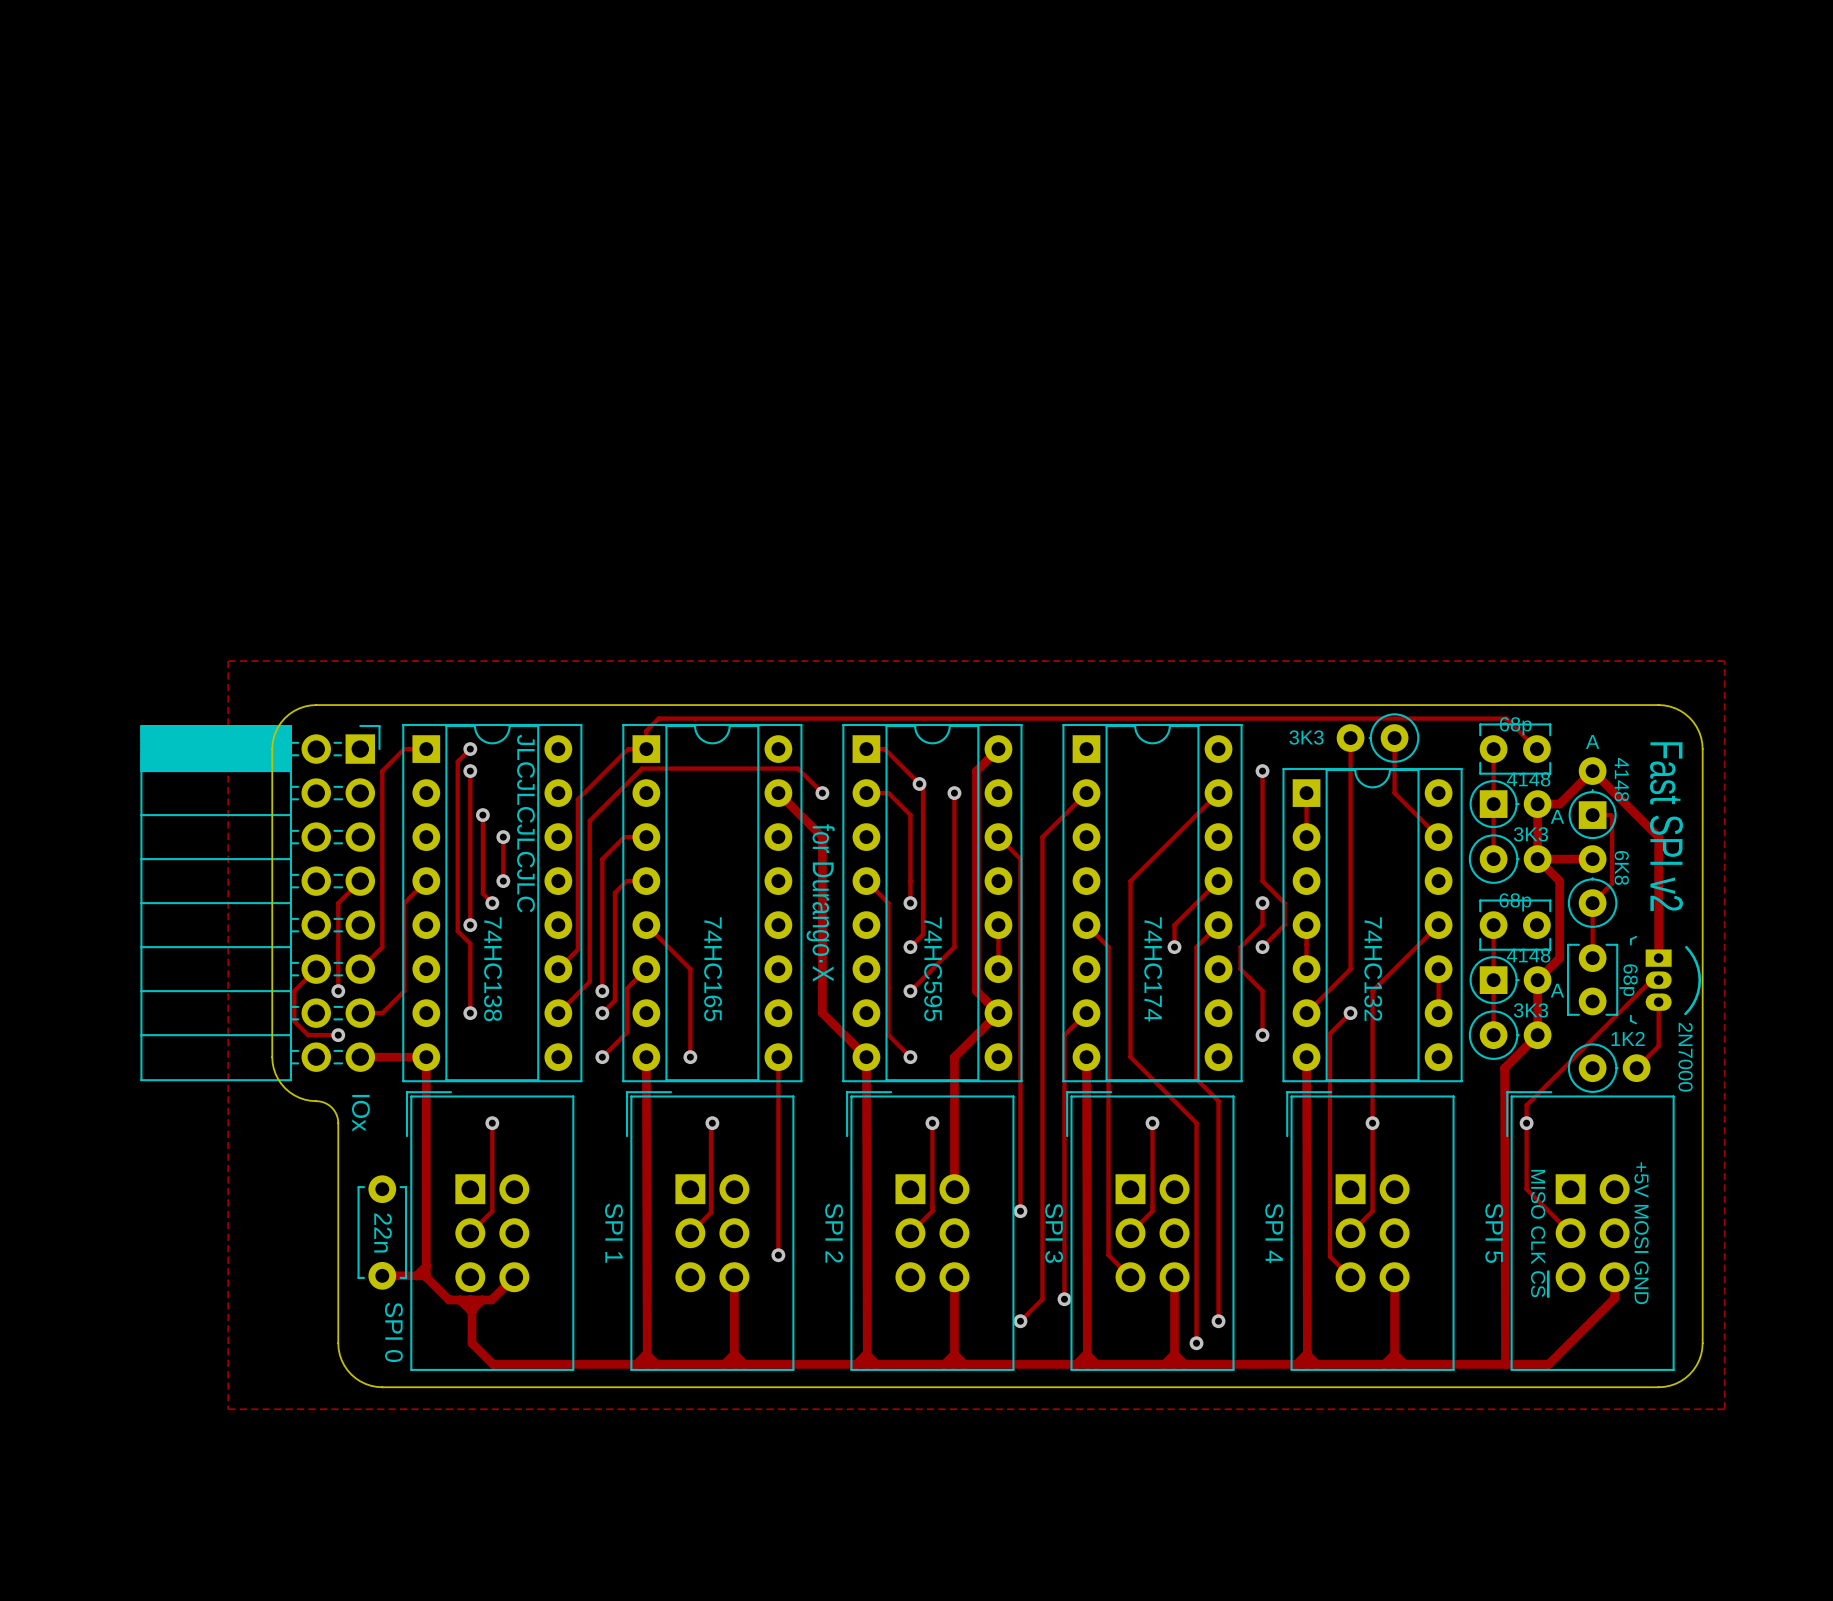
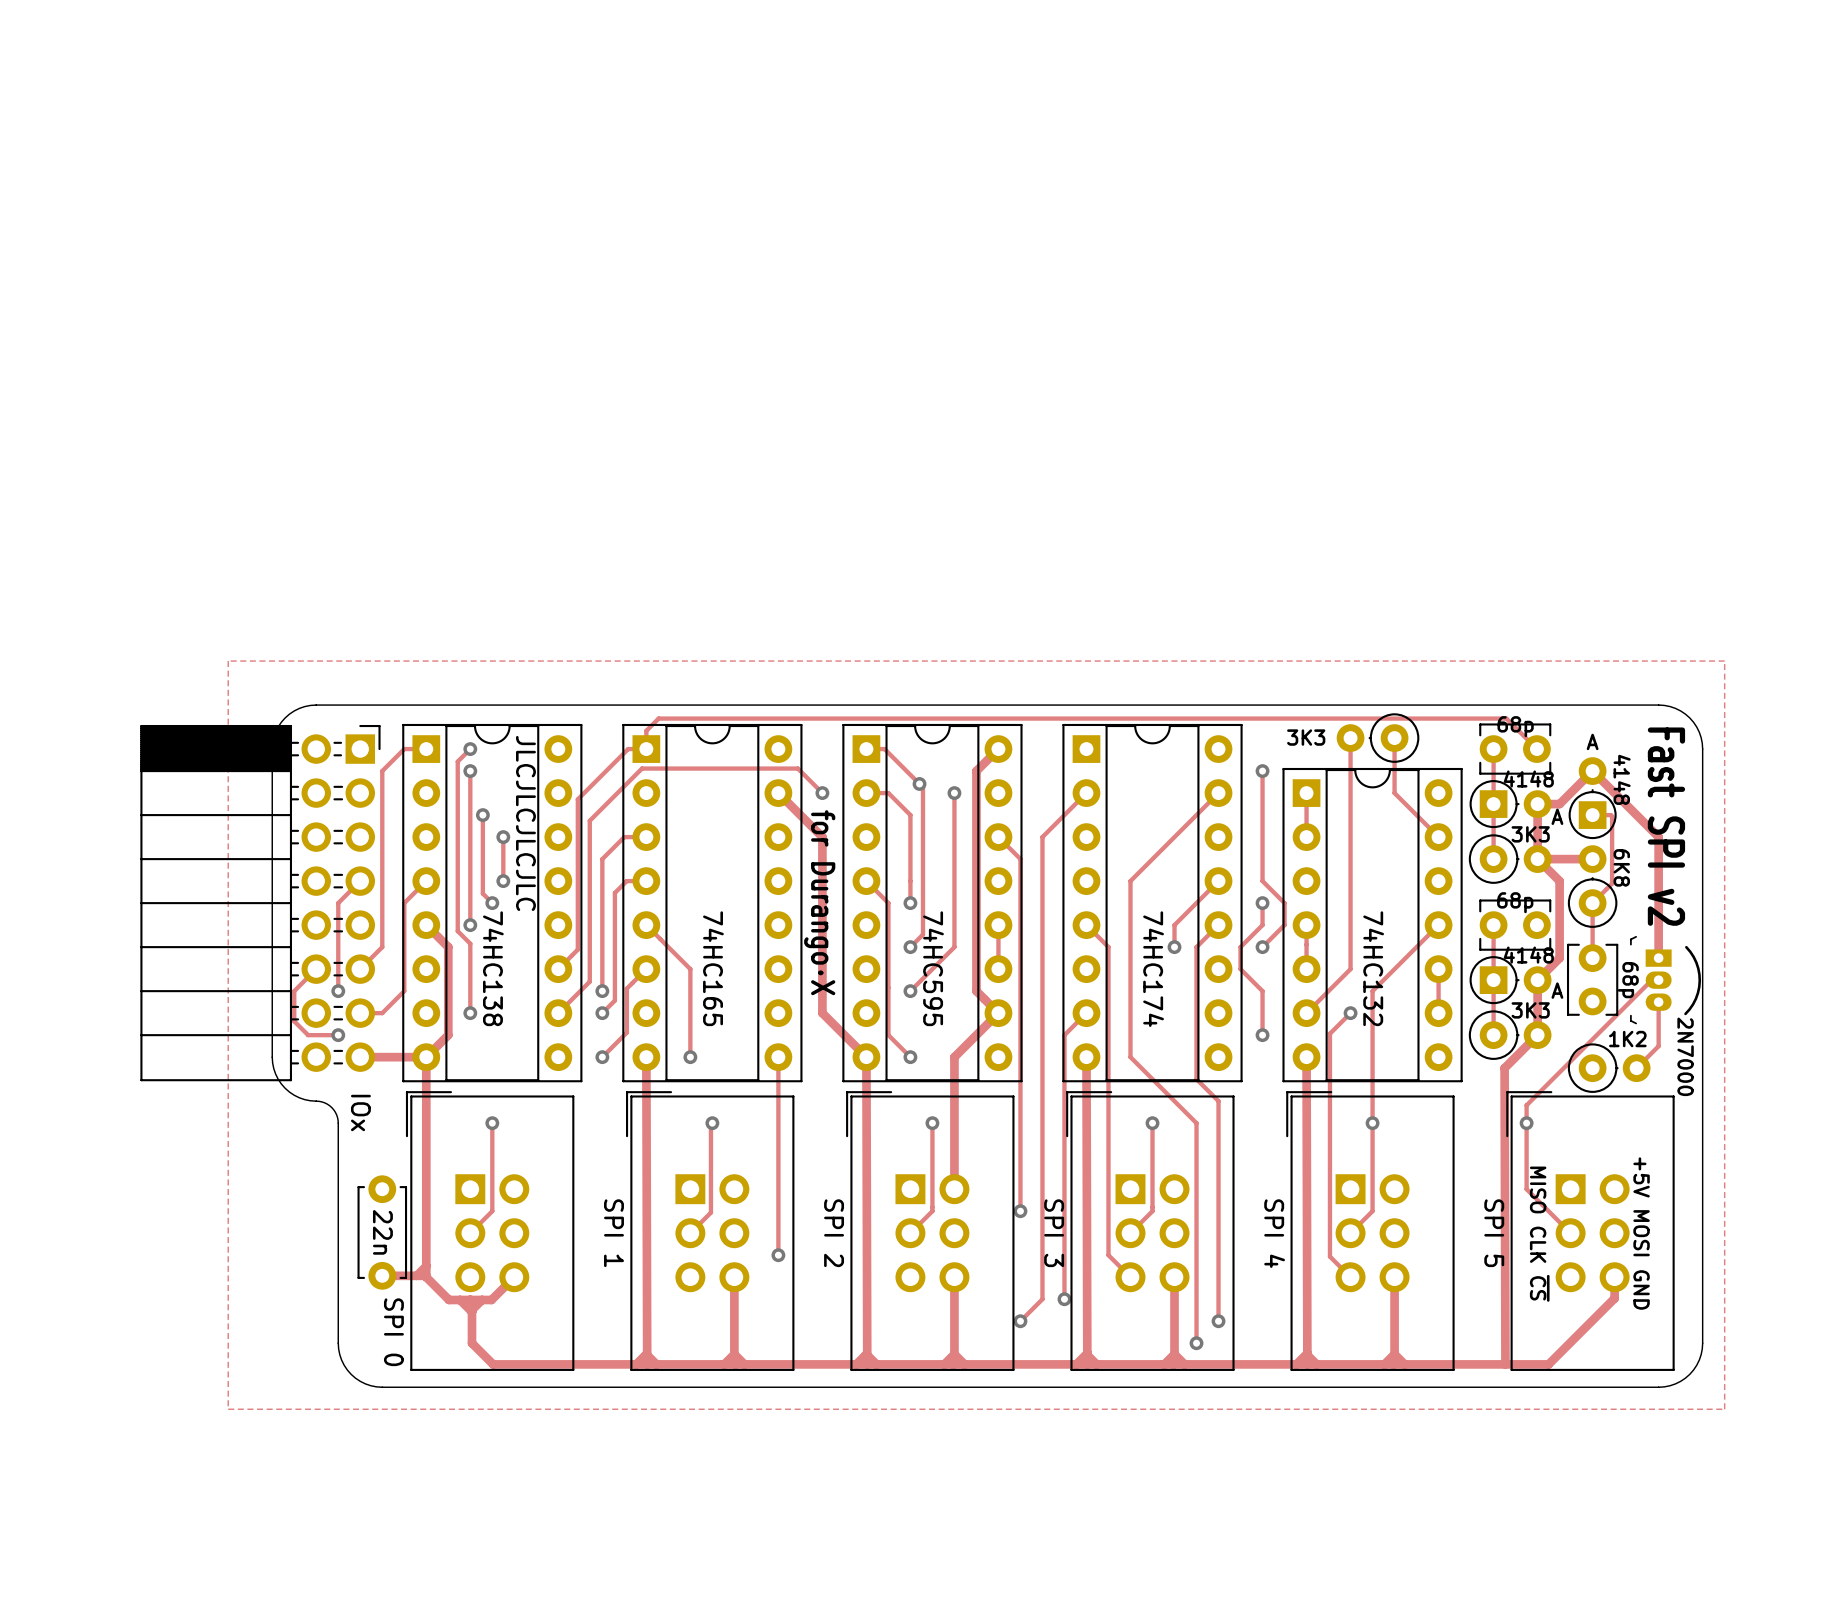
track: none -> (426, 925) (448, 947) (448, 1035) (426, 1057)

